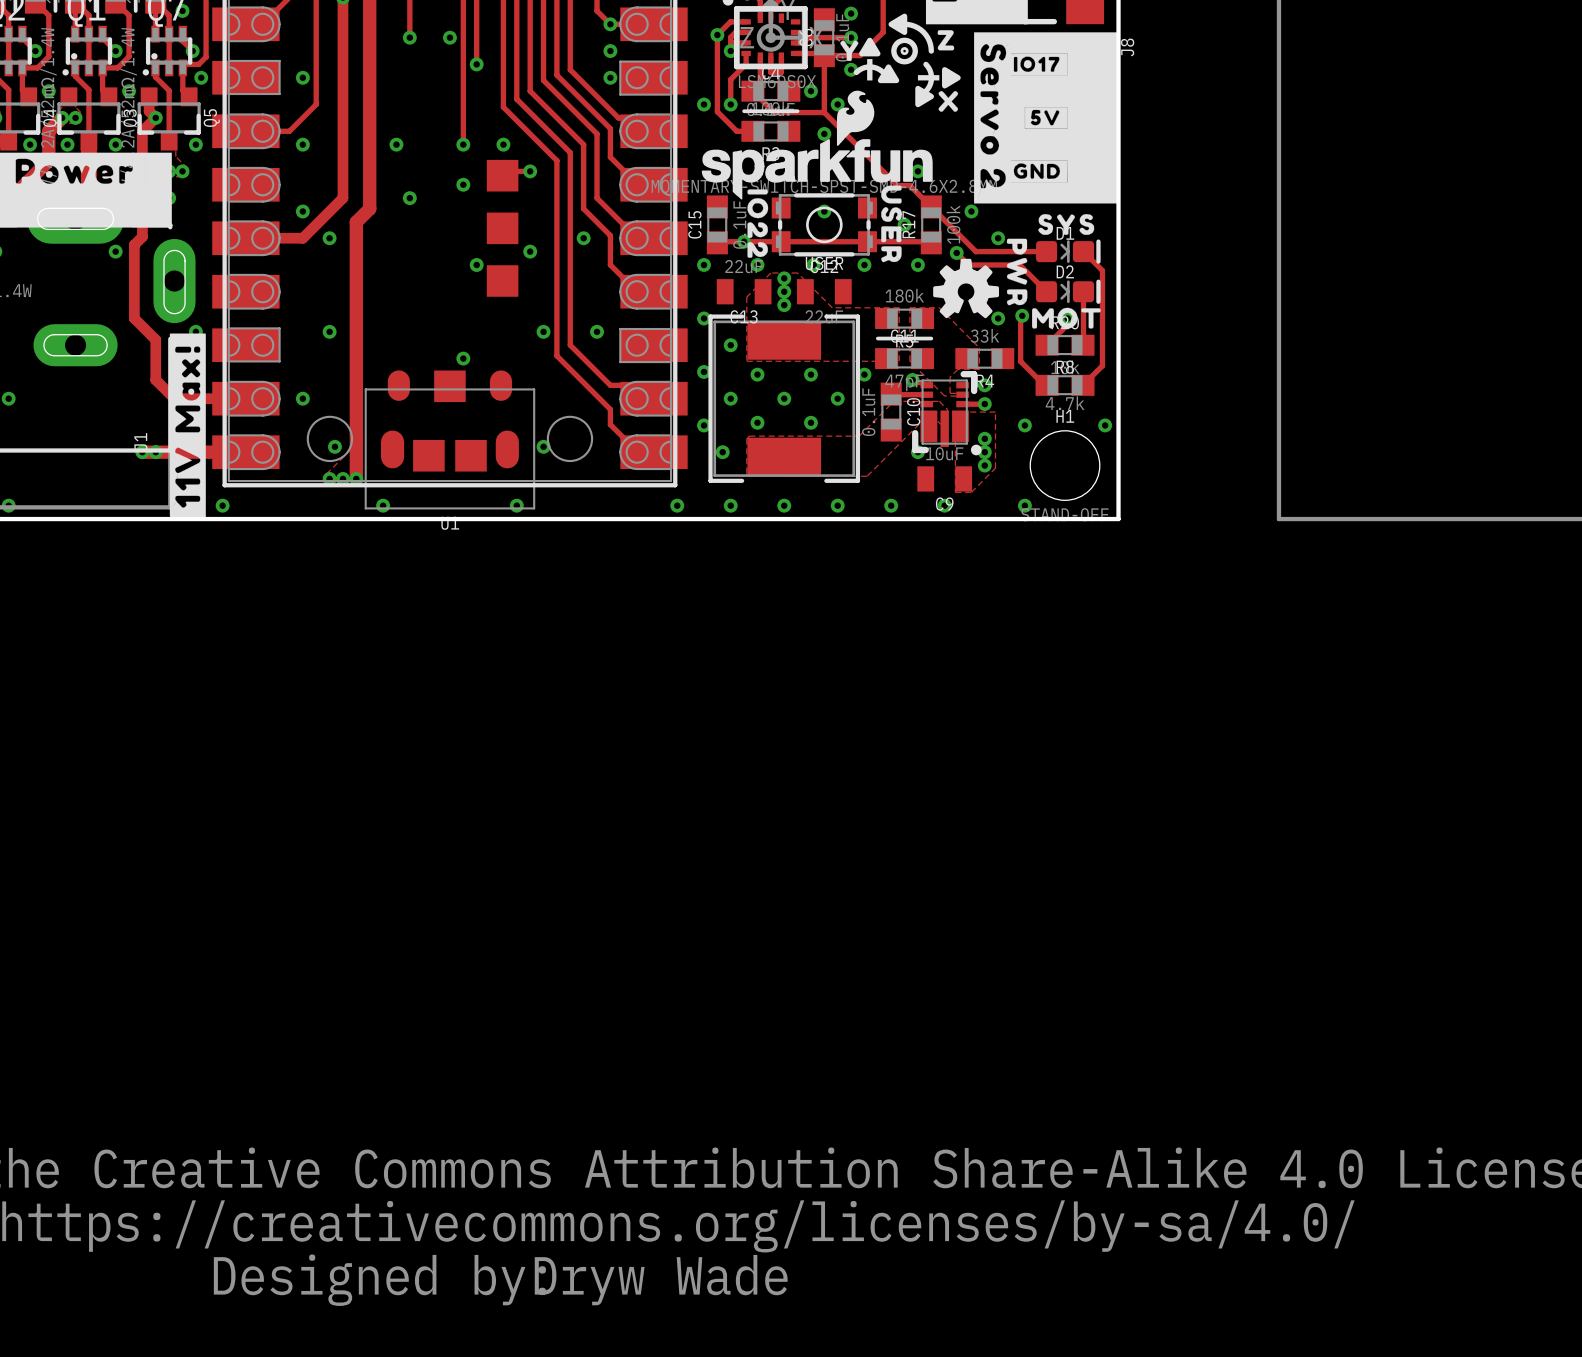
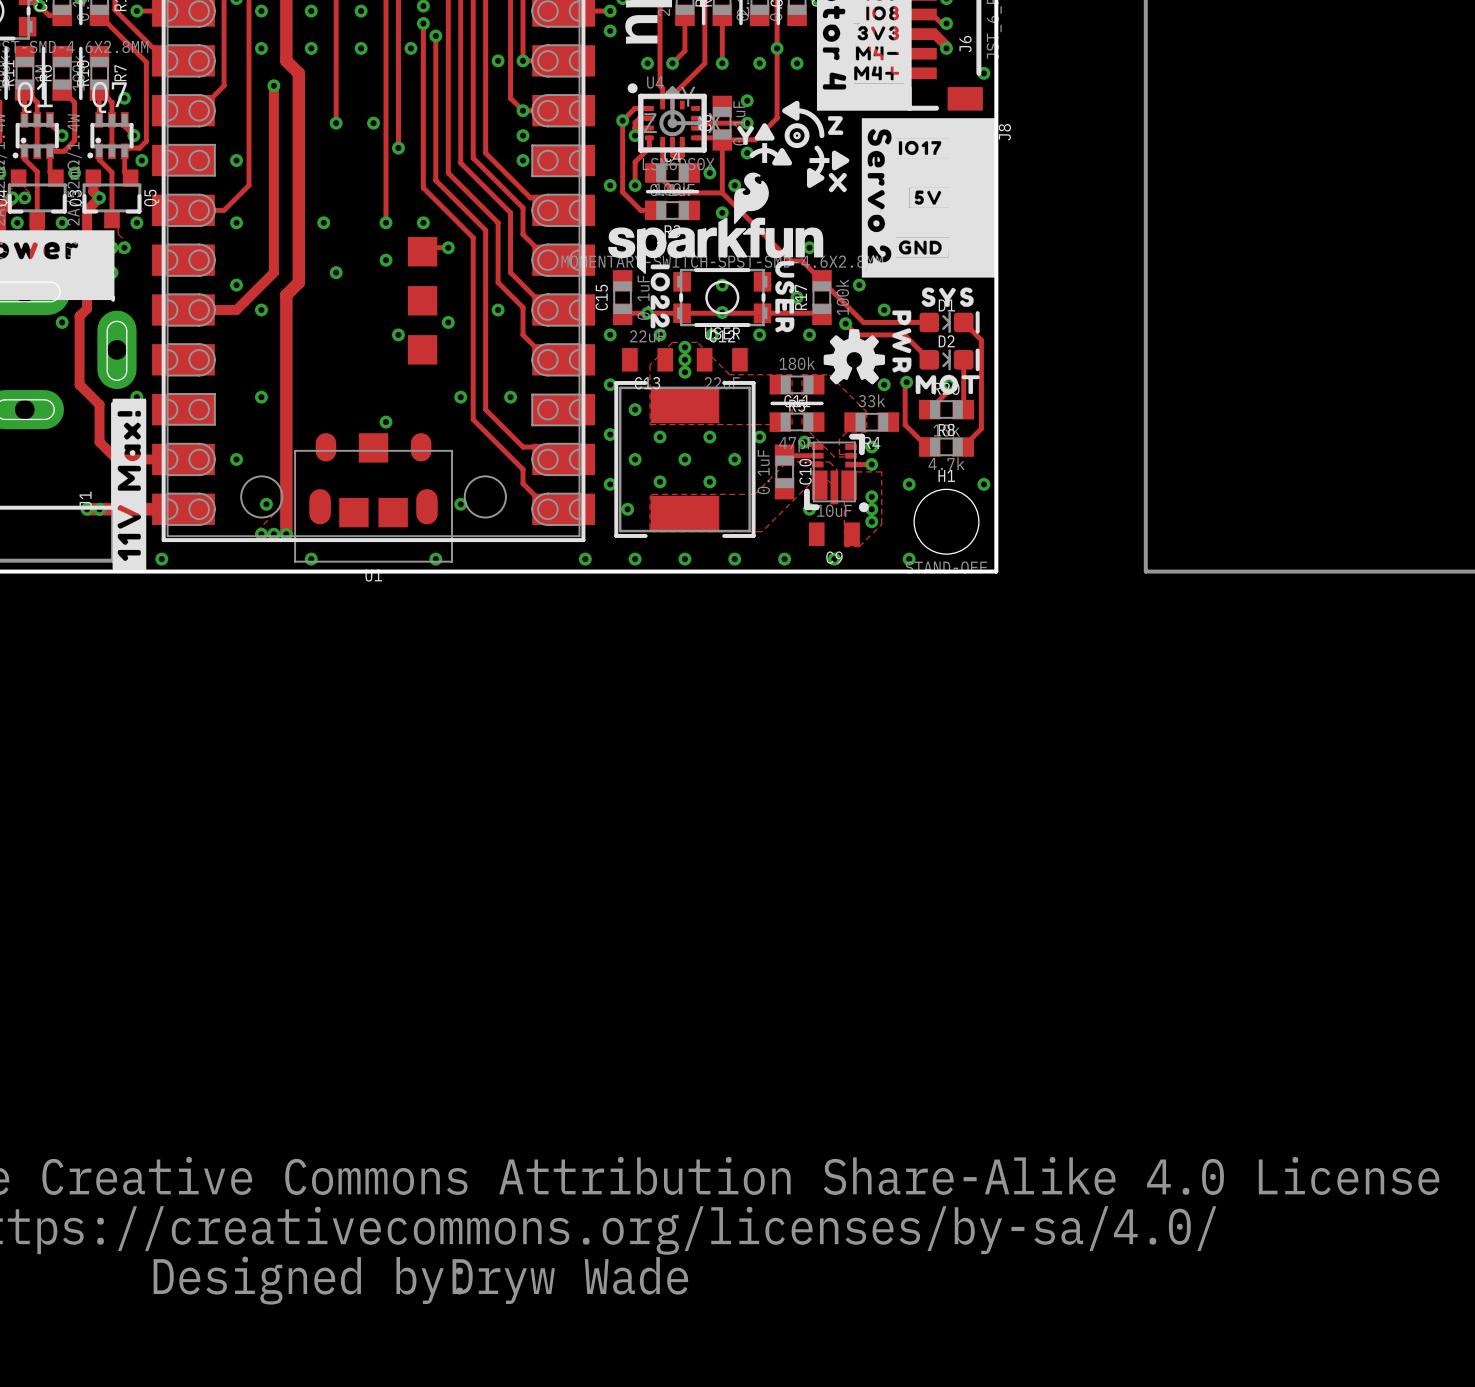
via: none -> (722, 312)

